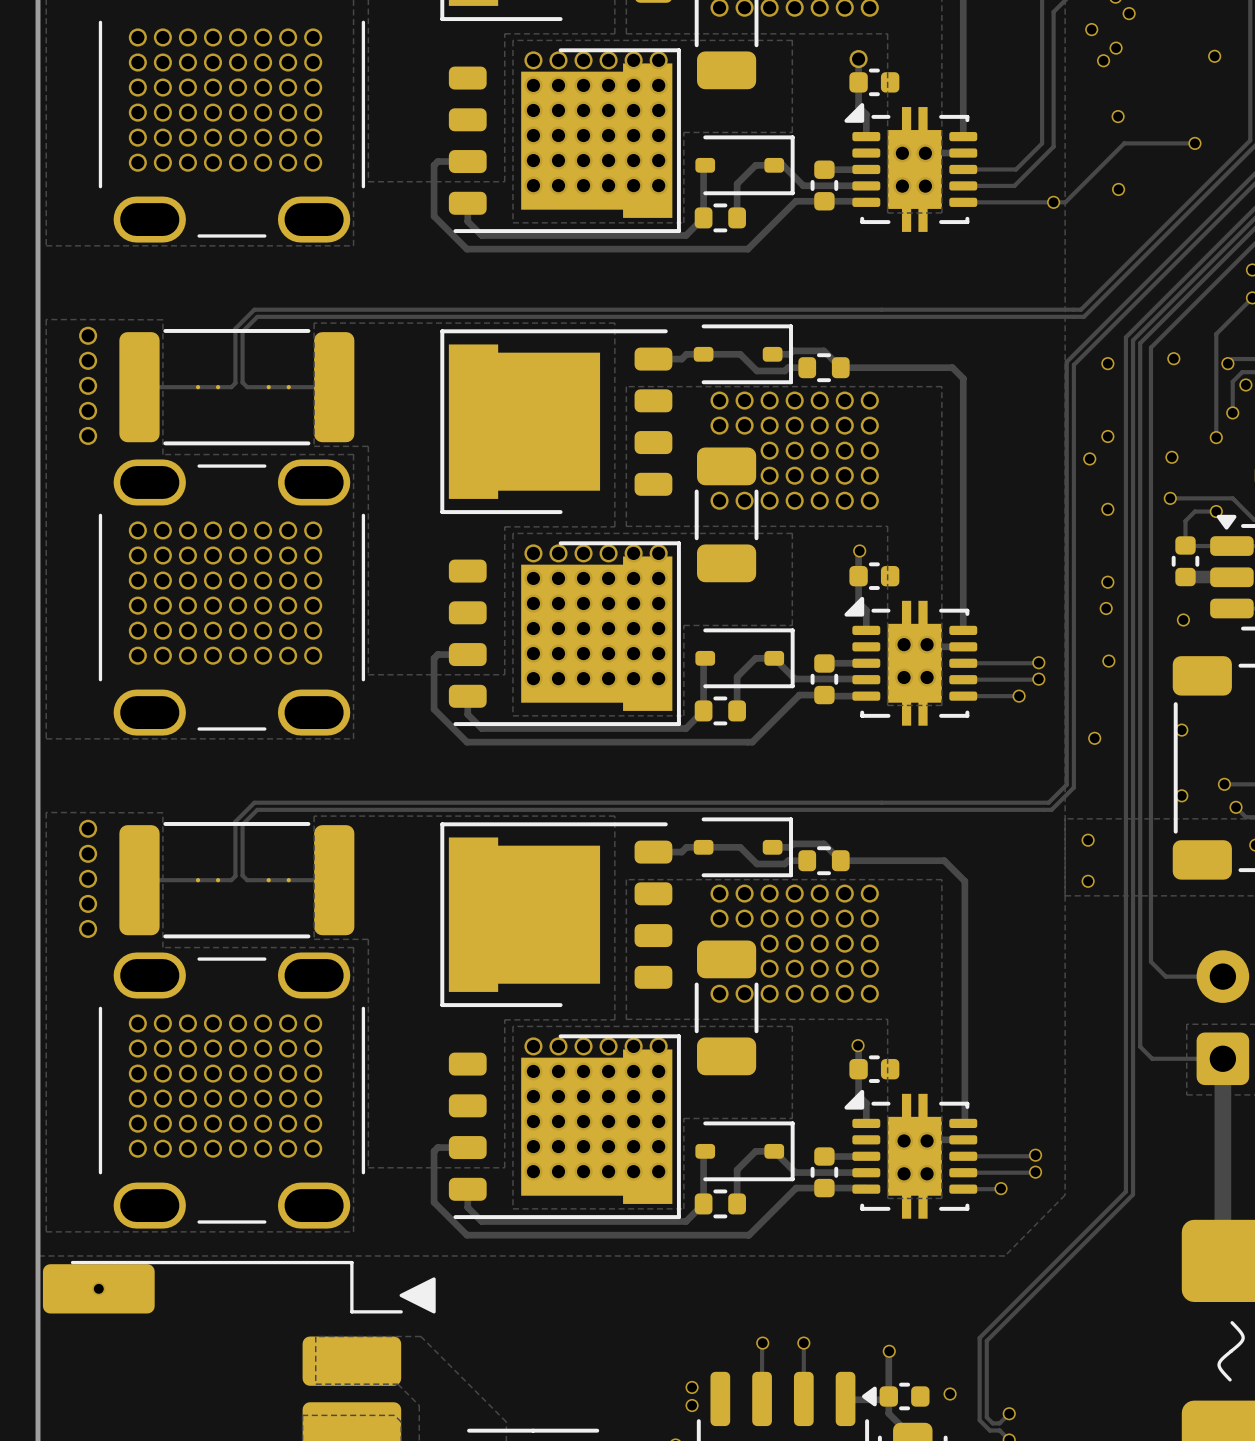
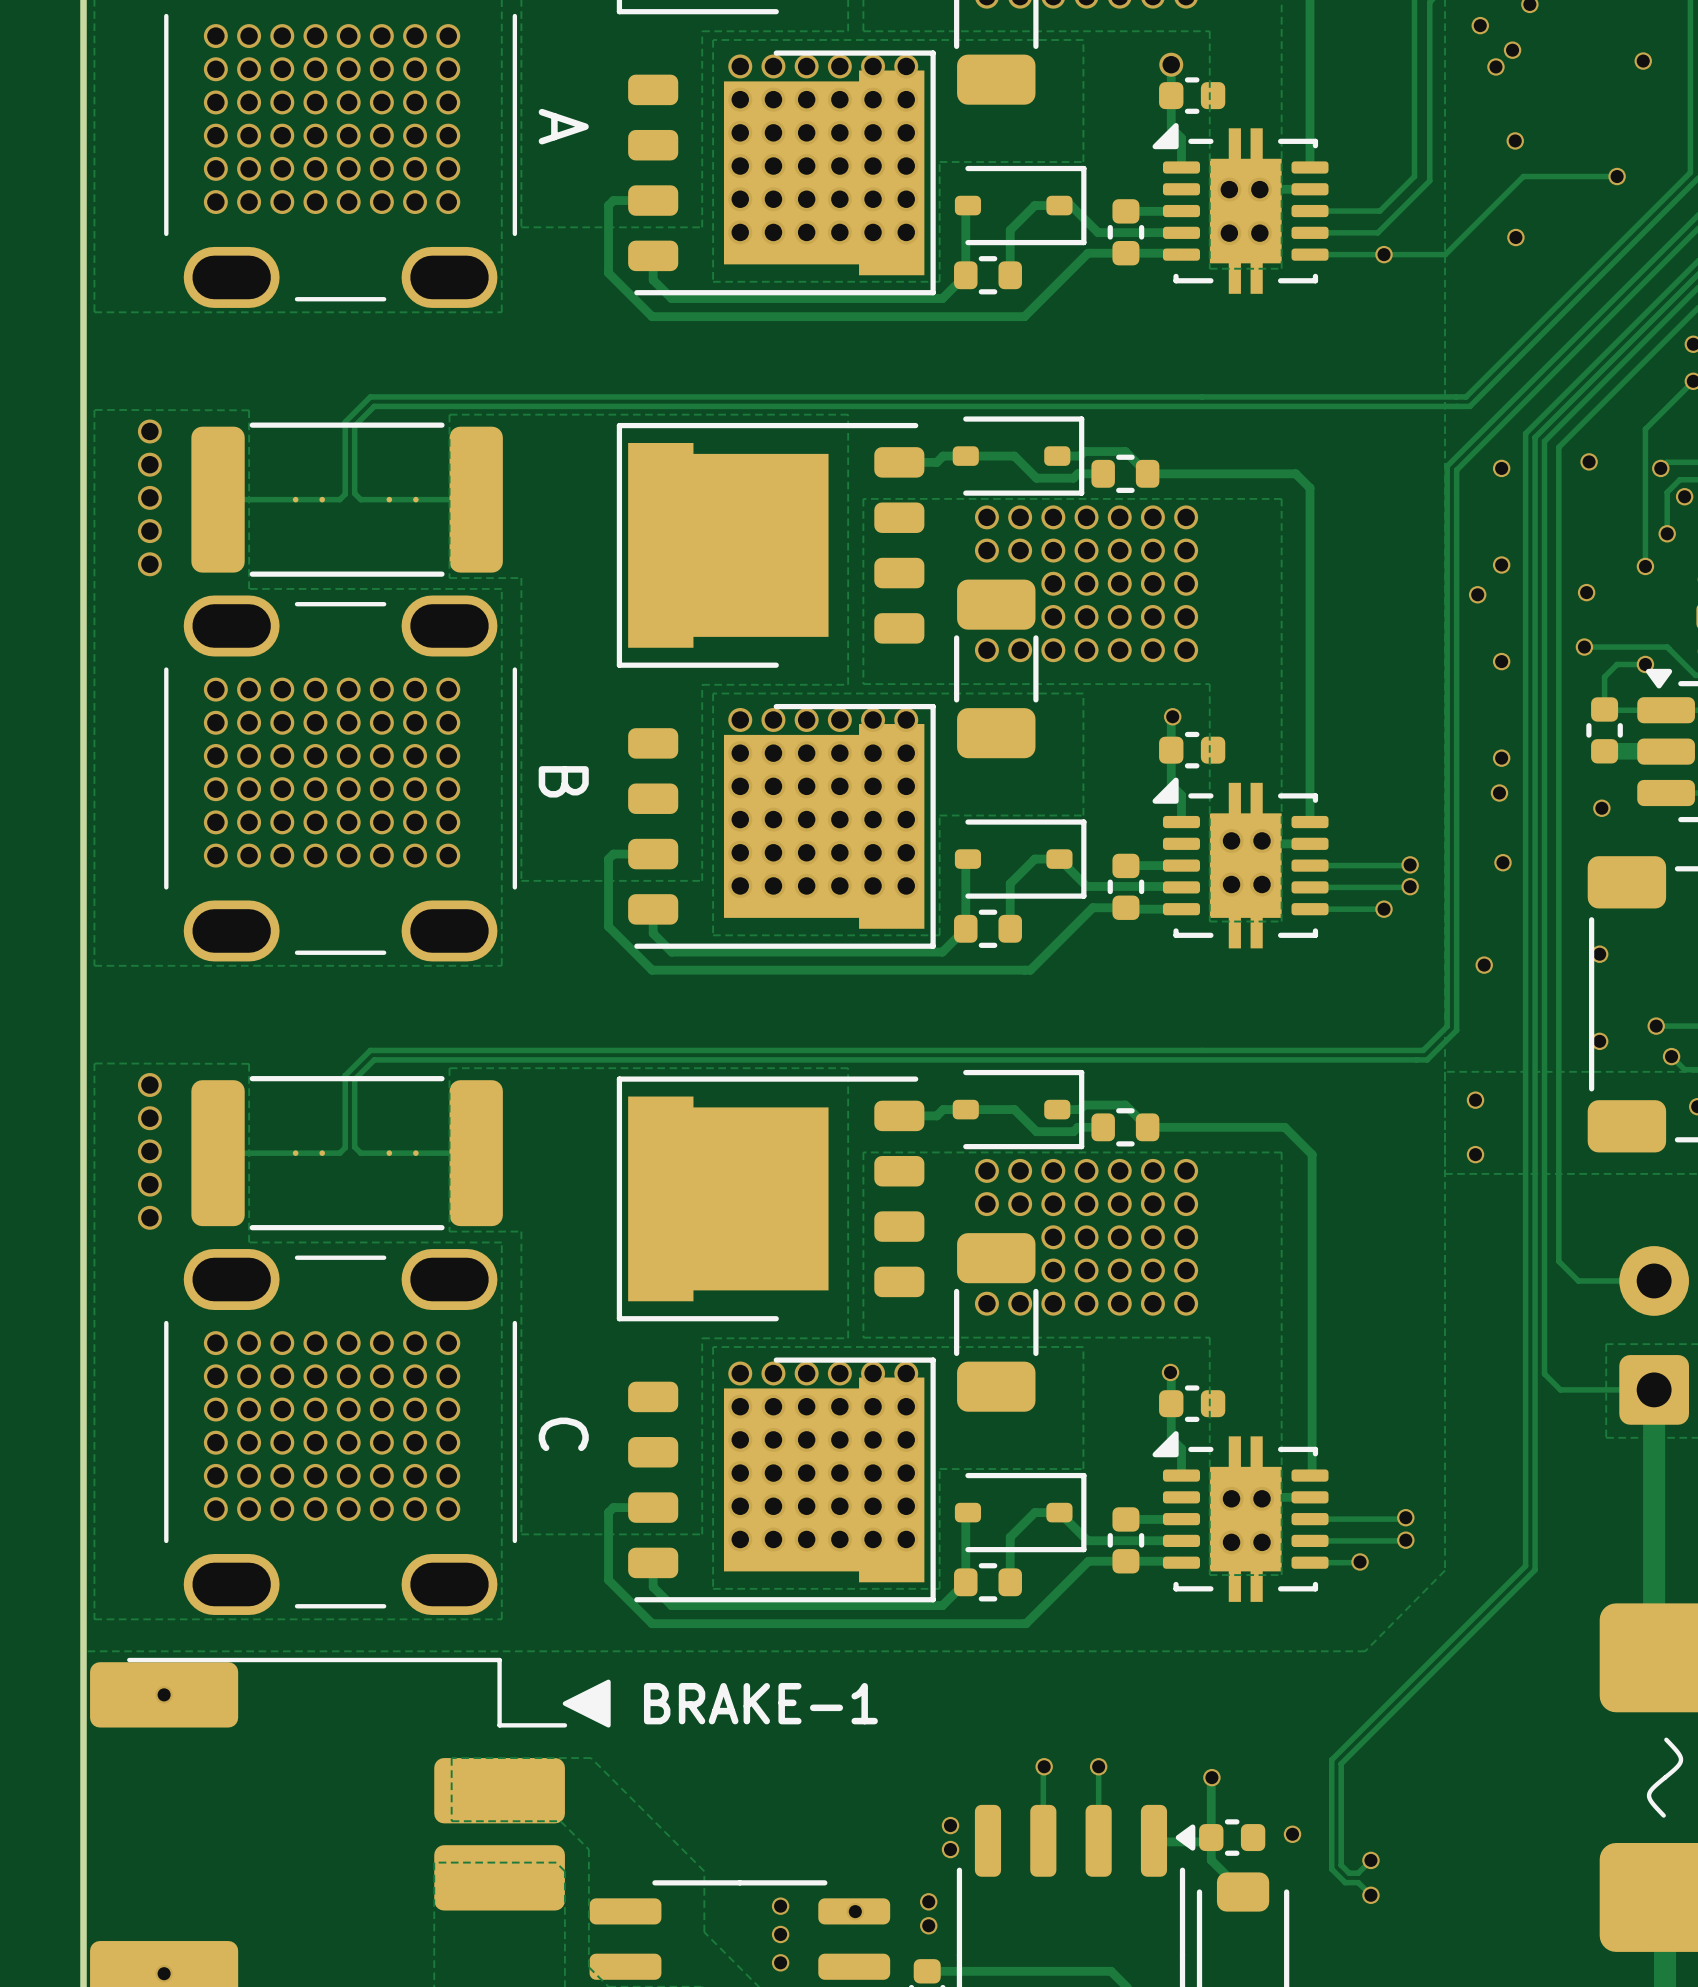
text: none -> A (563, 126)
via position: (1053, 202) -> (1384, 254)
text: none -> B (563, 781)
text: none -> C (563, 1434)
text: none -> BRAKE-1 (760, 1703)

